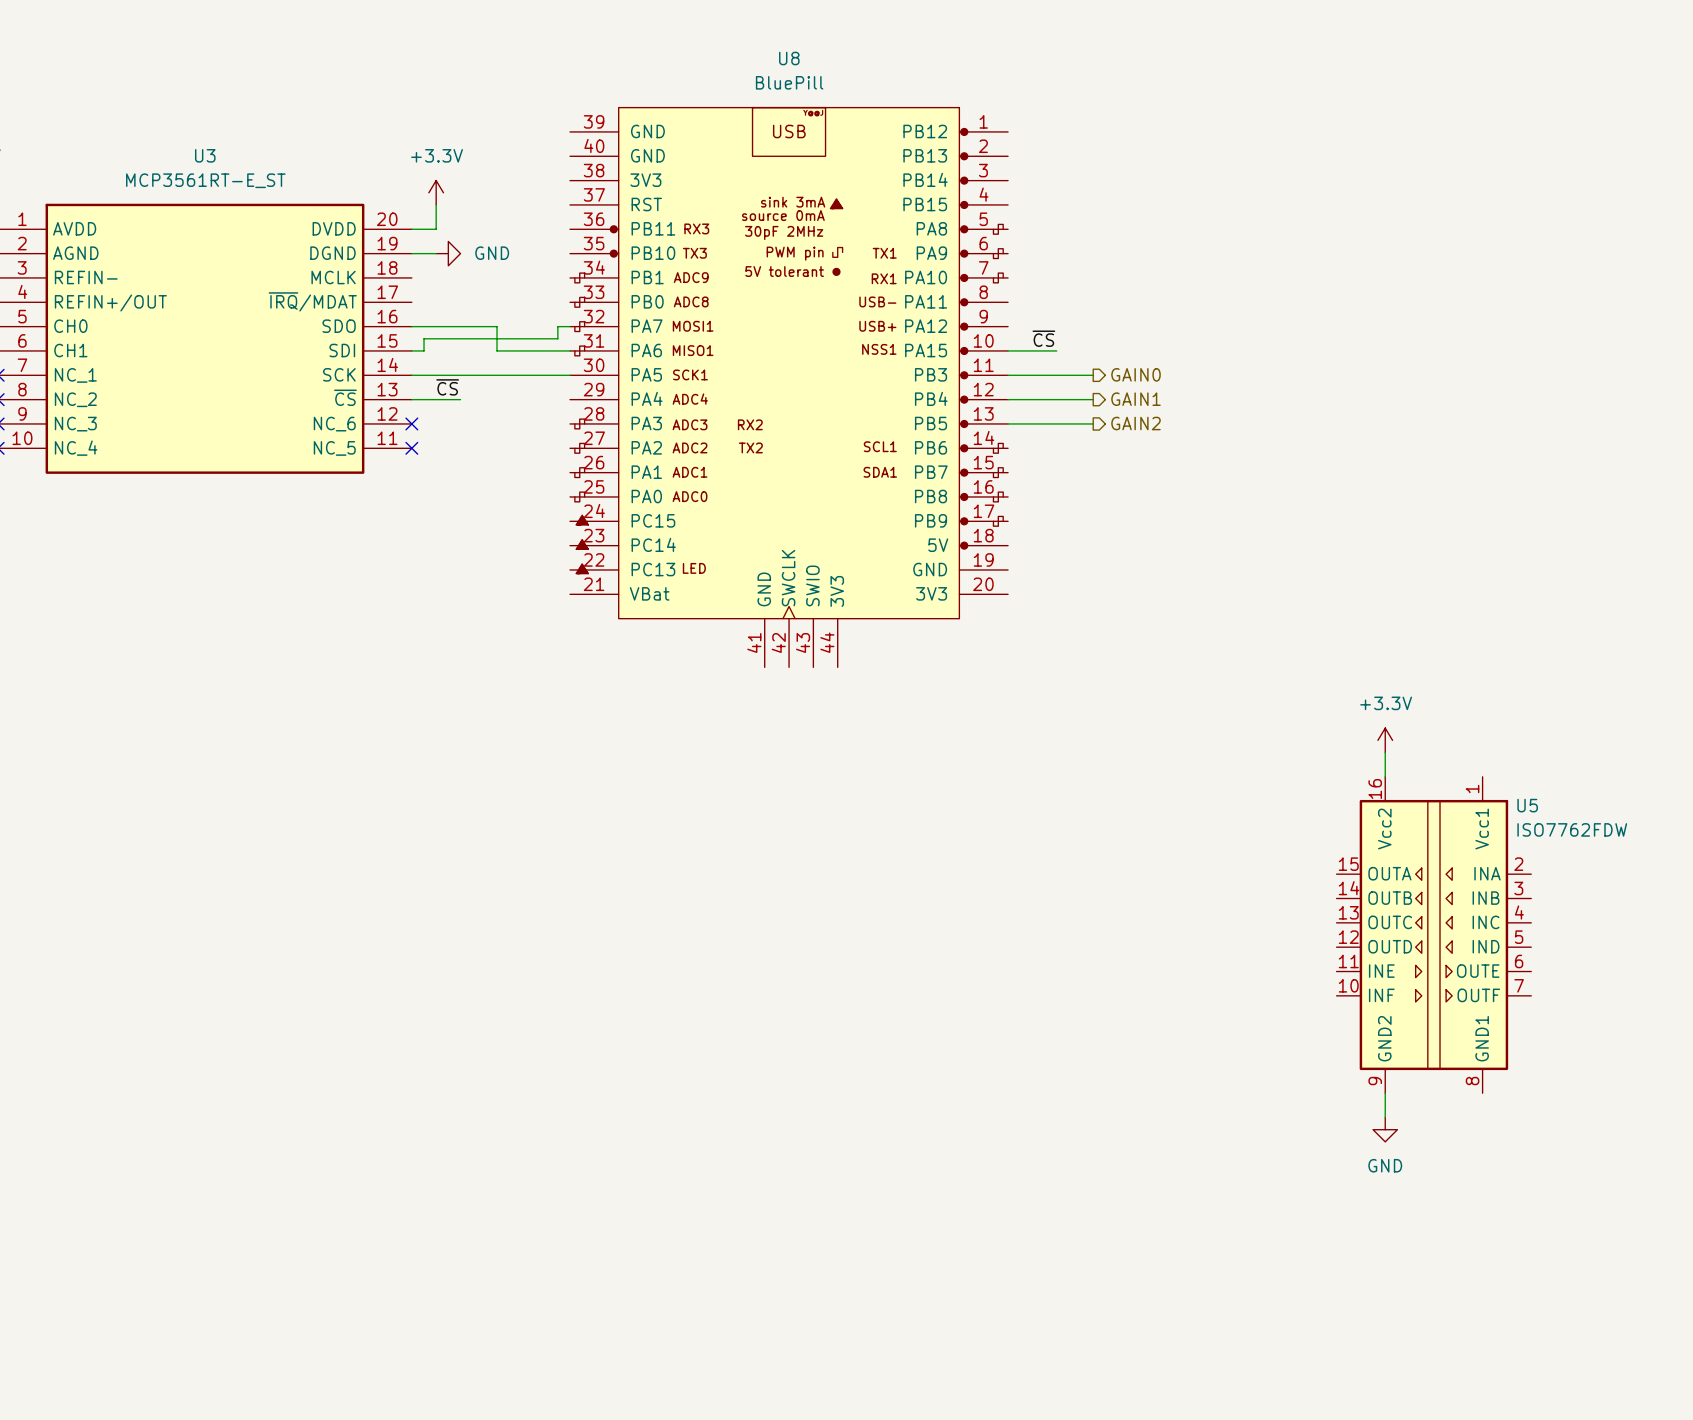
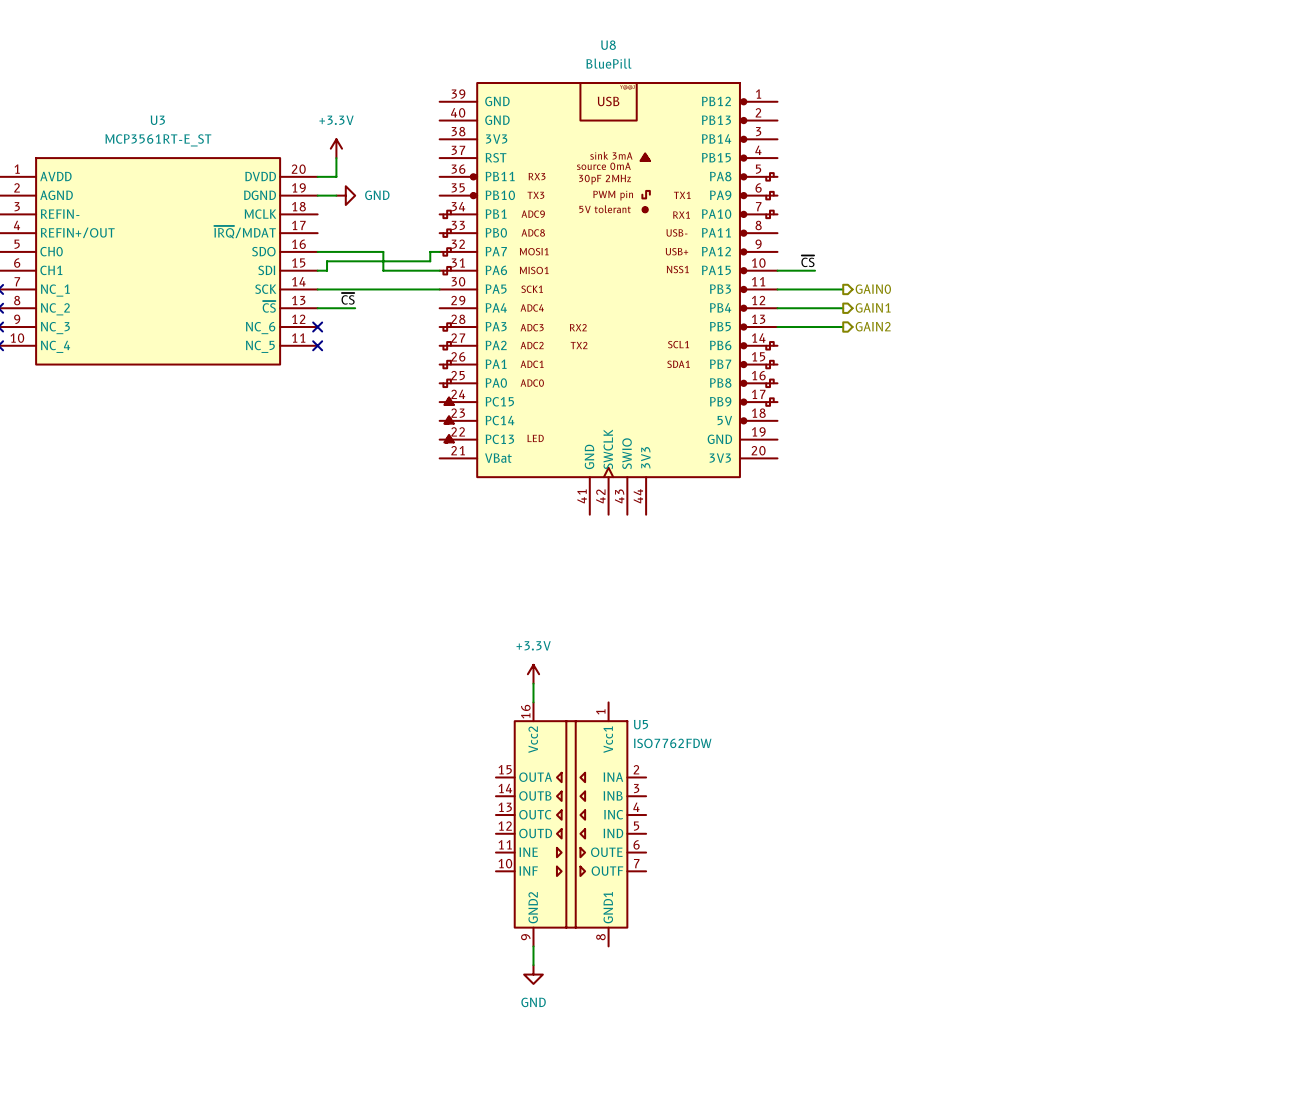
power symbol: +3.3V (1385, 740) -> none
wire: (1385, 752) (1385, 776) -> none
power symbol: none -> +3.3V (533, 674)
wire: none -> (533, 683) (533, 702)
U5 position: (1433, 935) -> (571, 824)
wire: (1385, 1093) (1385, 1117) -> none
power symbol: GND (1385, 1129) -> none
wire: none -> (533, 946) (533, 965)
power symbol: none -> GND (533, 974)

